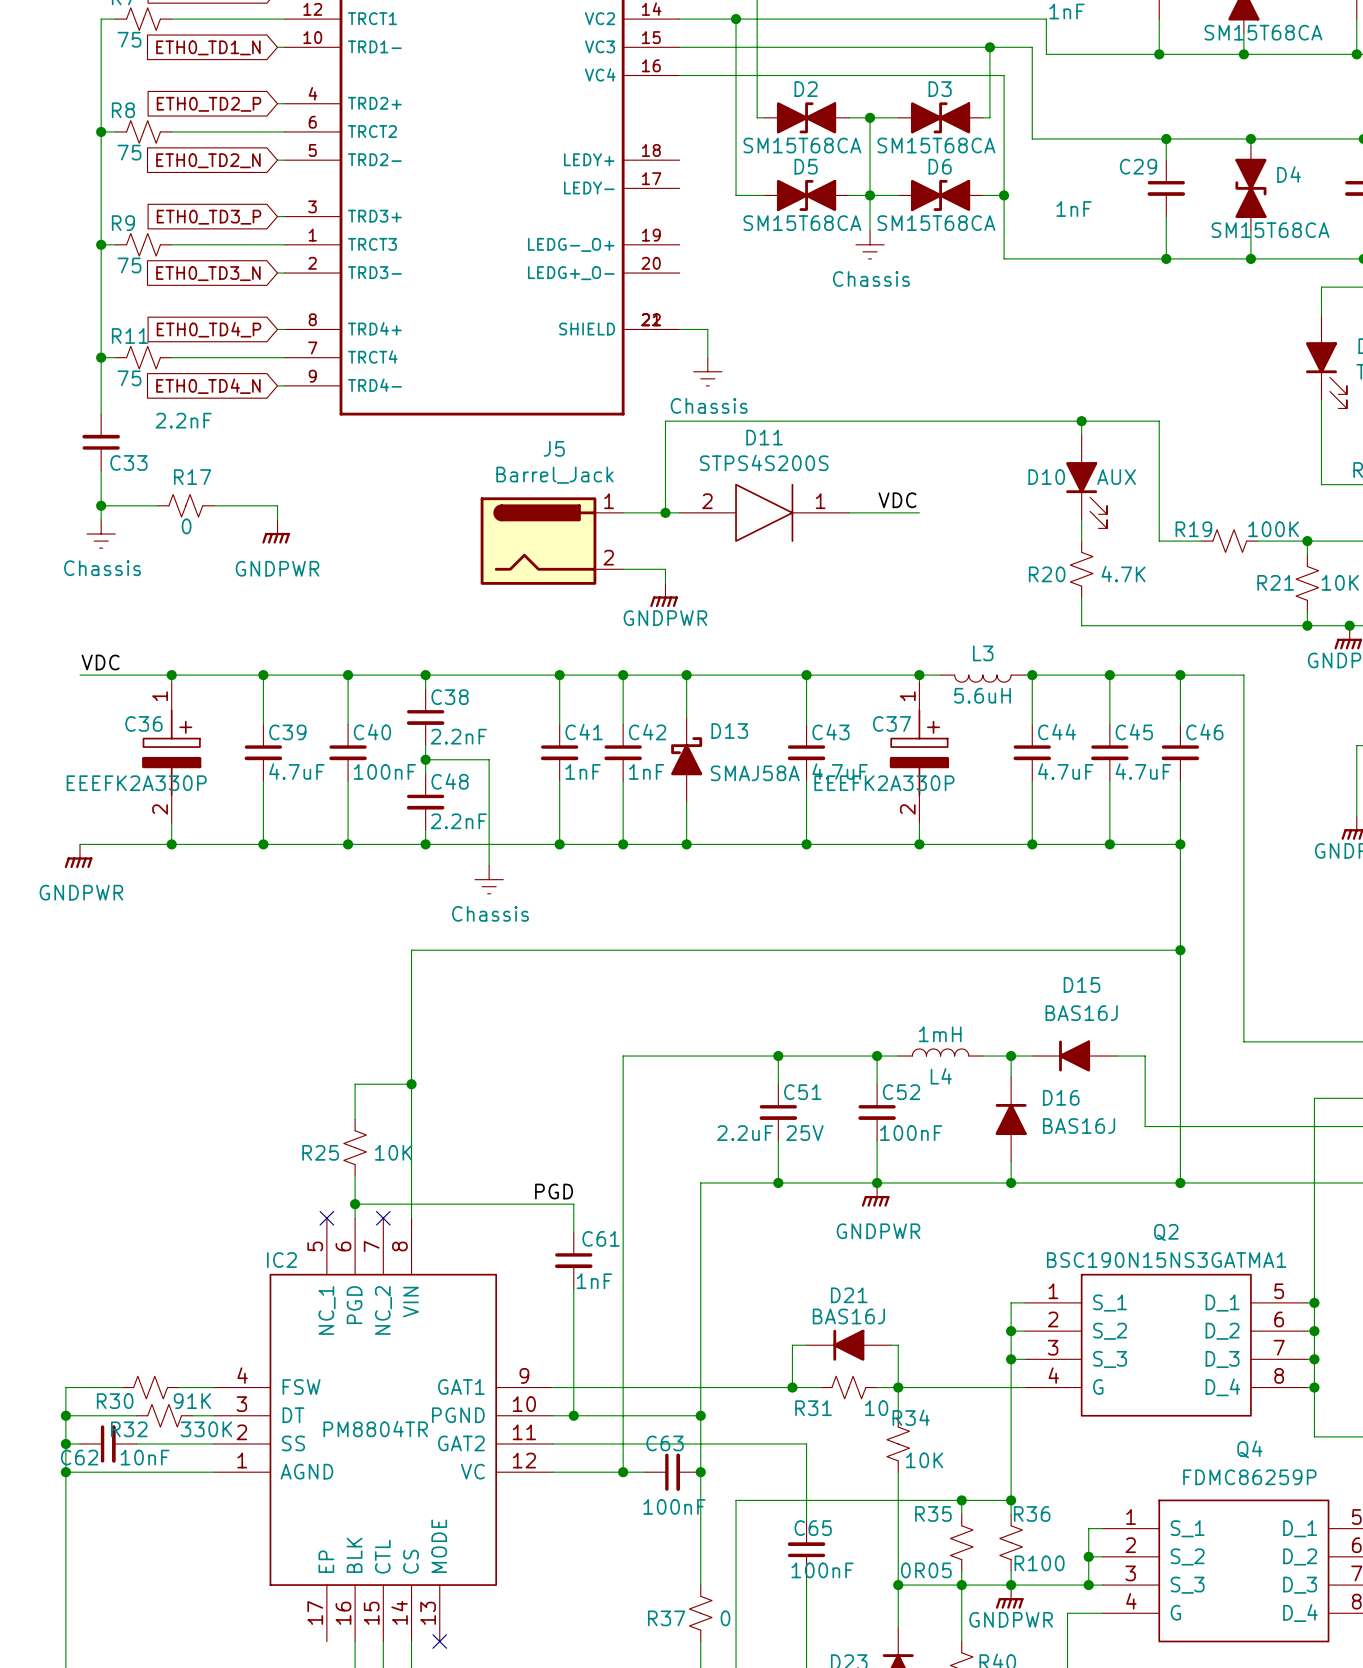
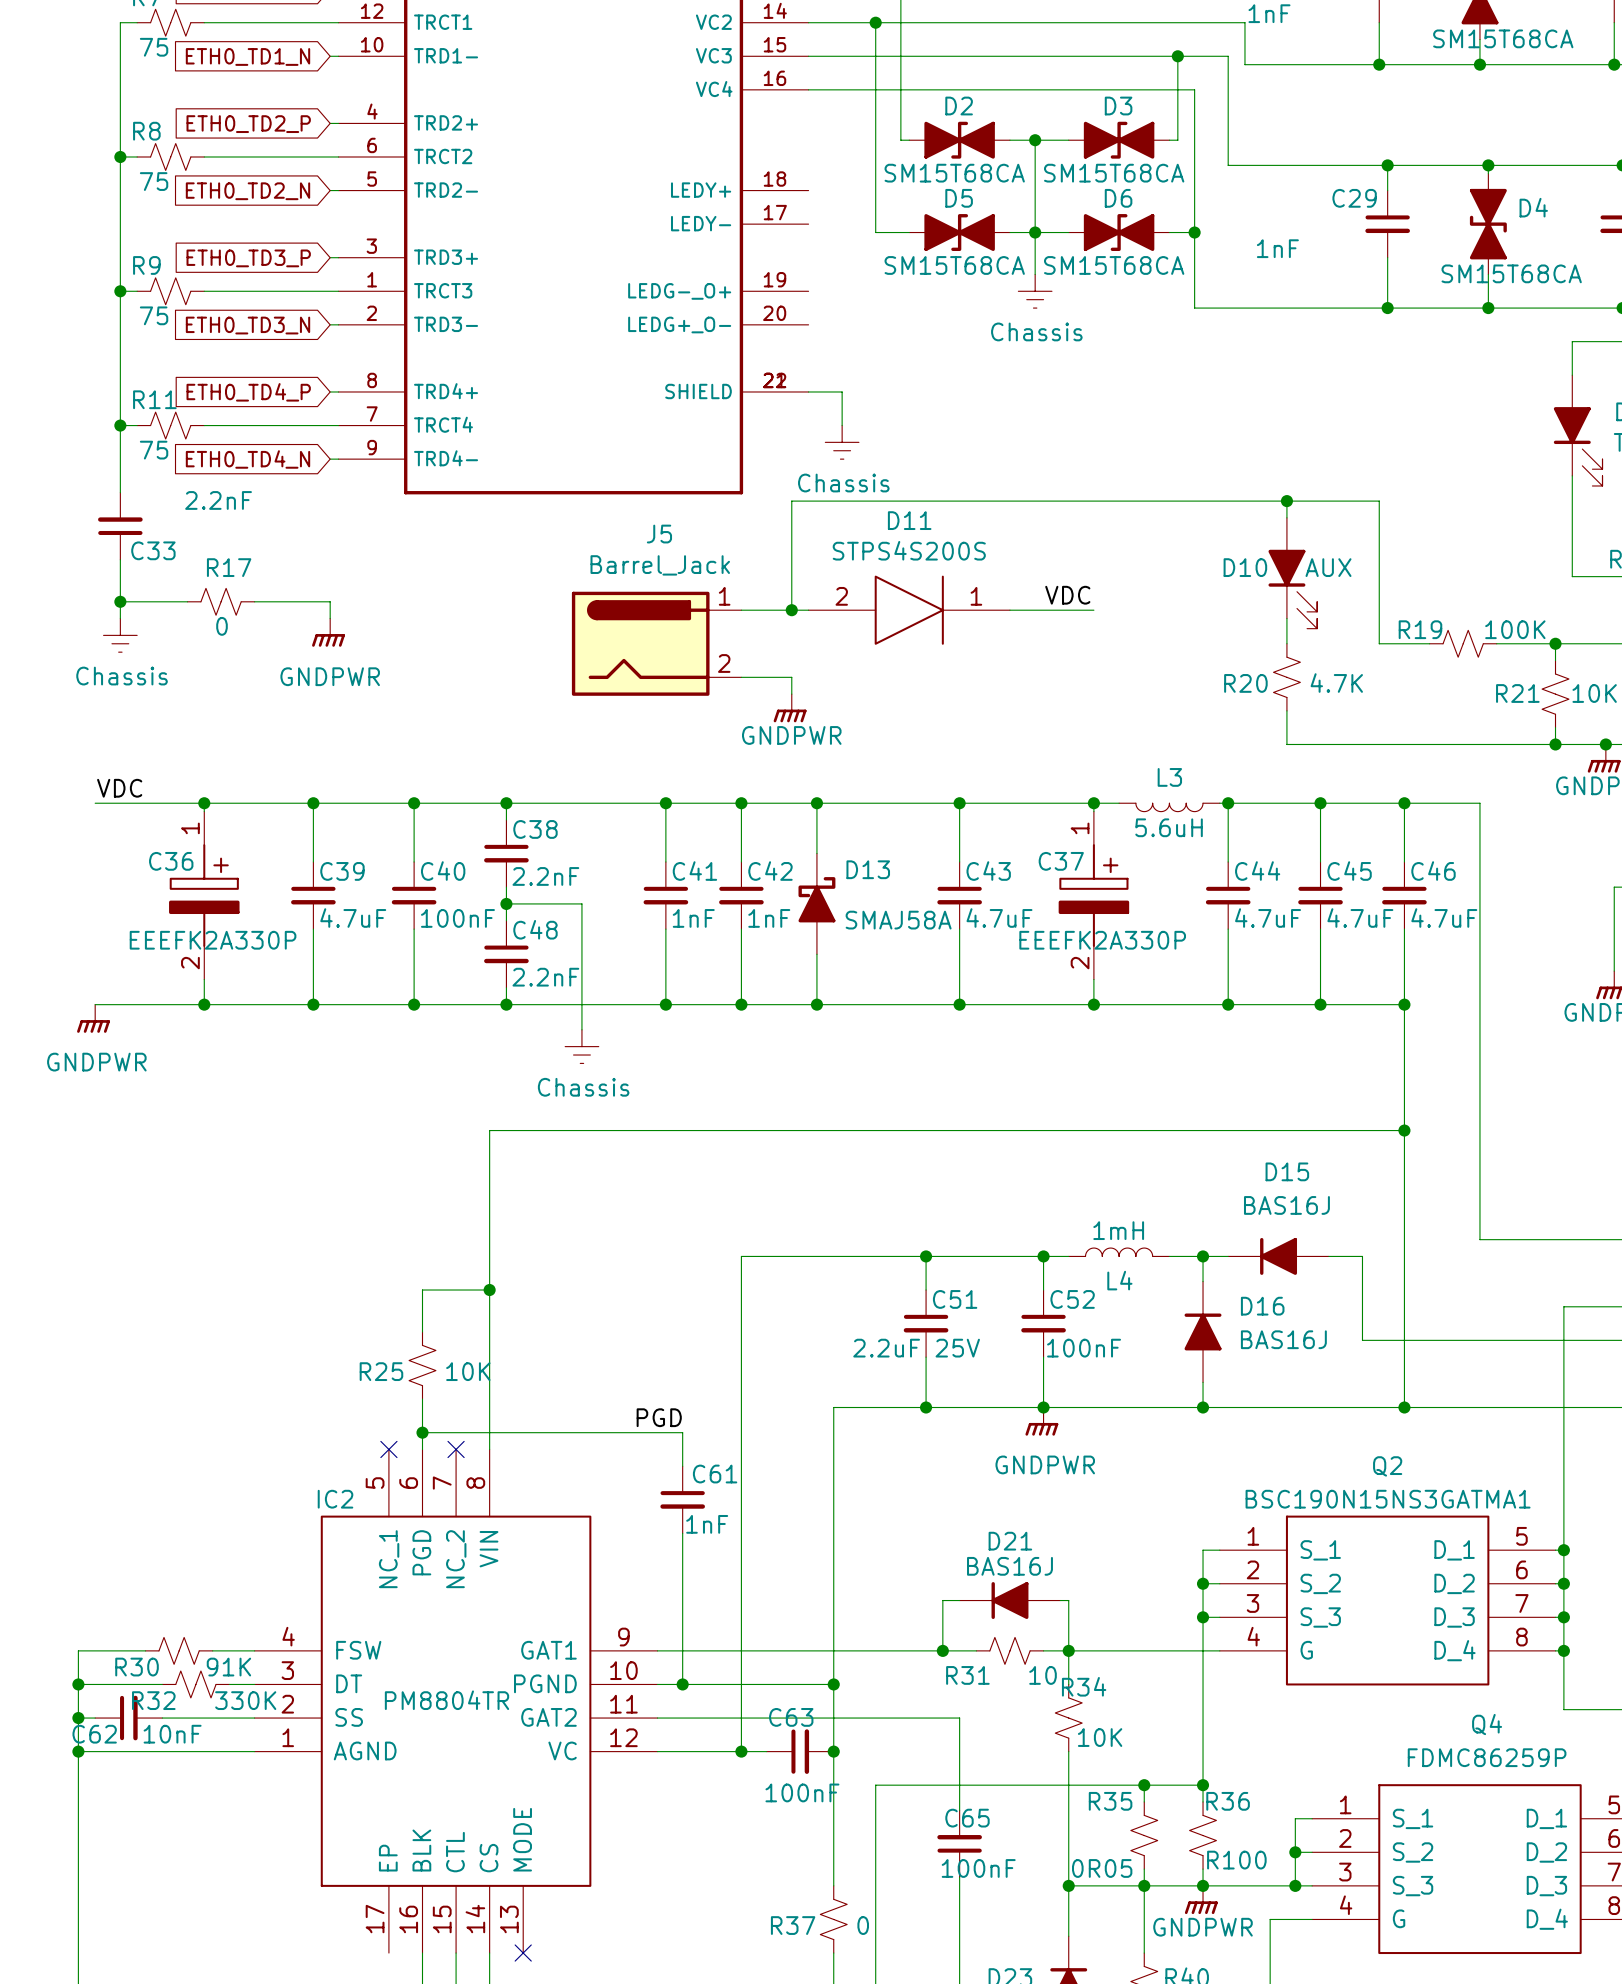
C46 value: none -> 4.7uF (1444, 918)
C36 value position: EEEFK2A330P (136, 783) -> EEEFK2A330P (213, 940)
C37 value position: EEEFK2A330P (884, 783) -> EEEFK2A330P (1102, 940)

